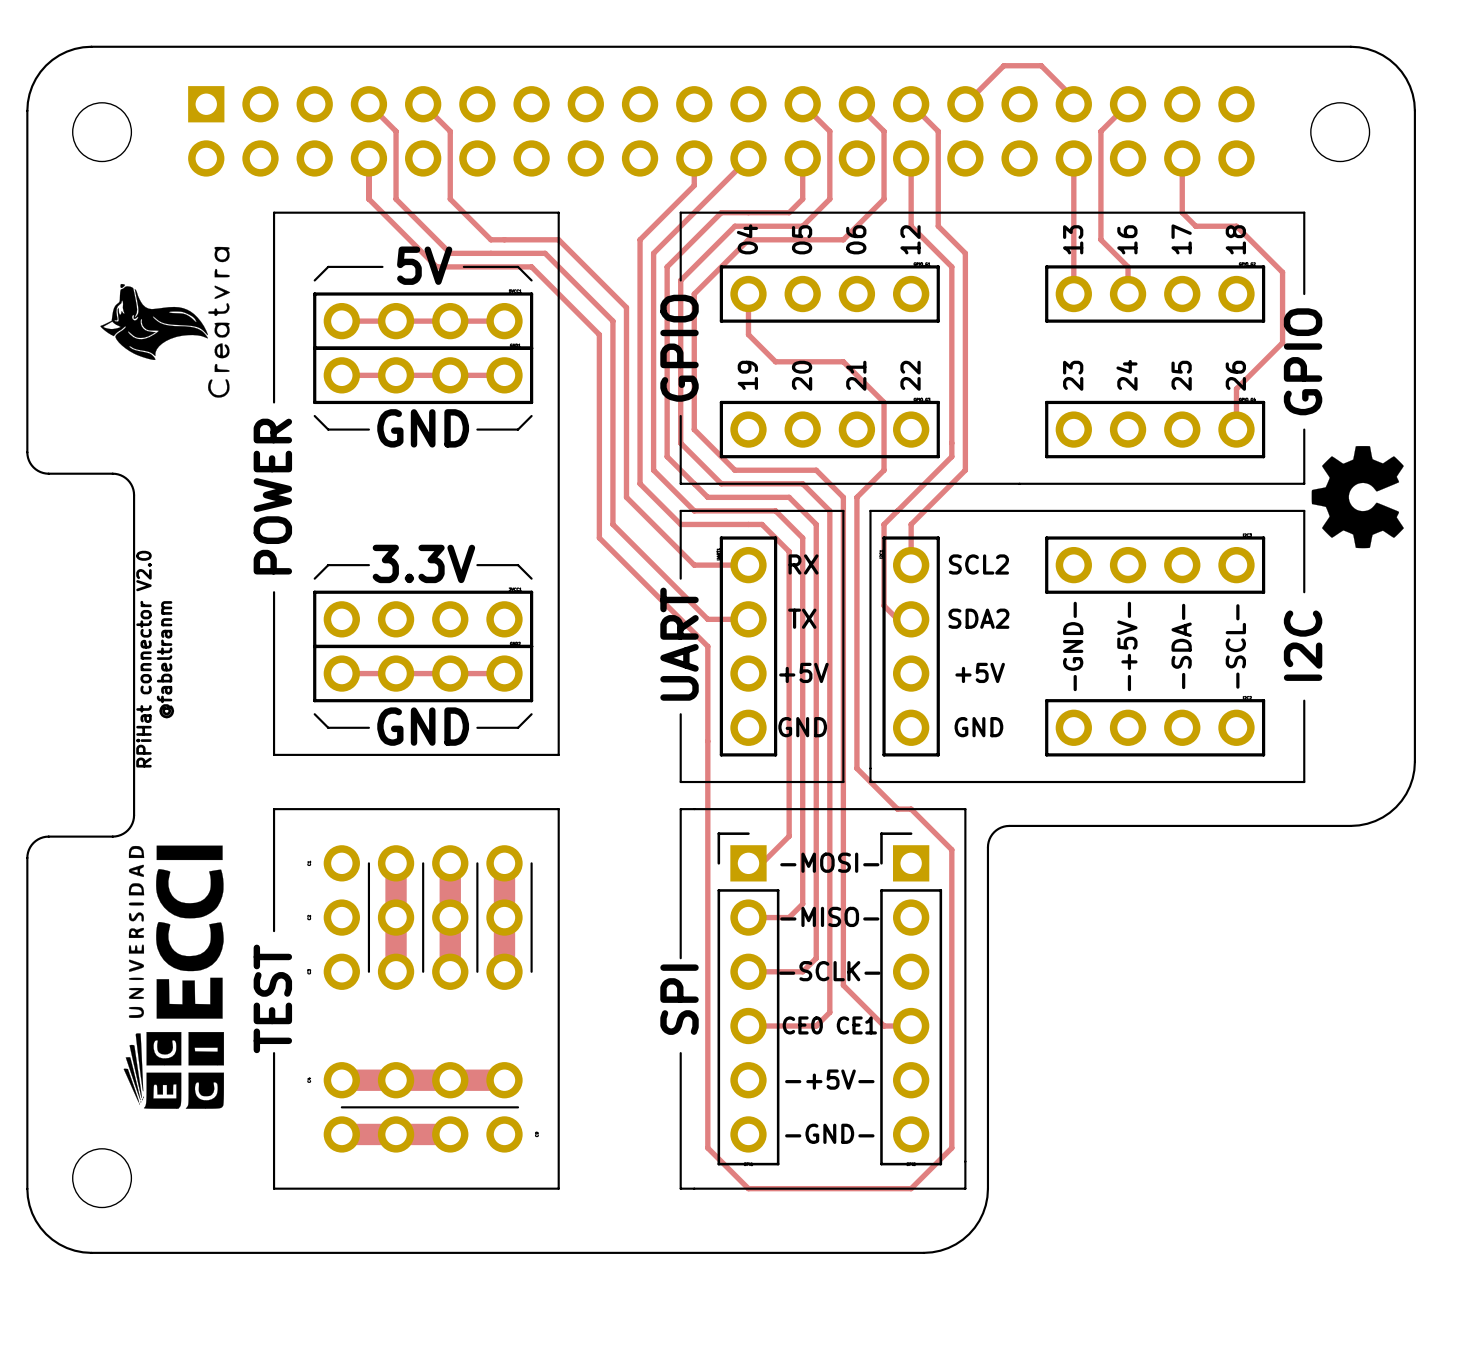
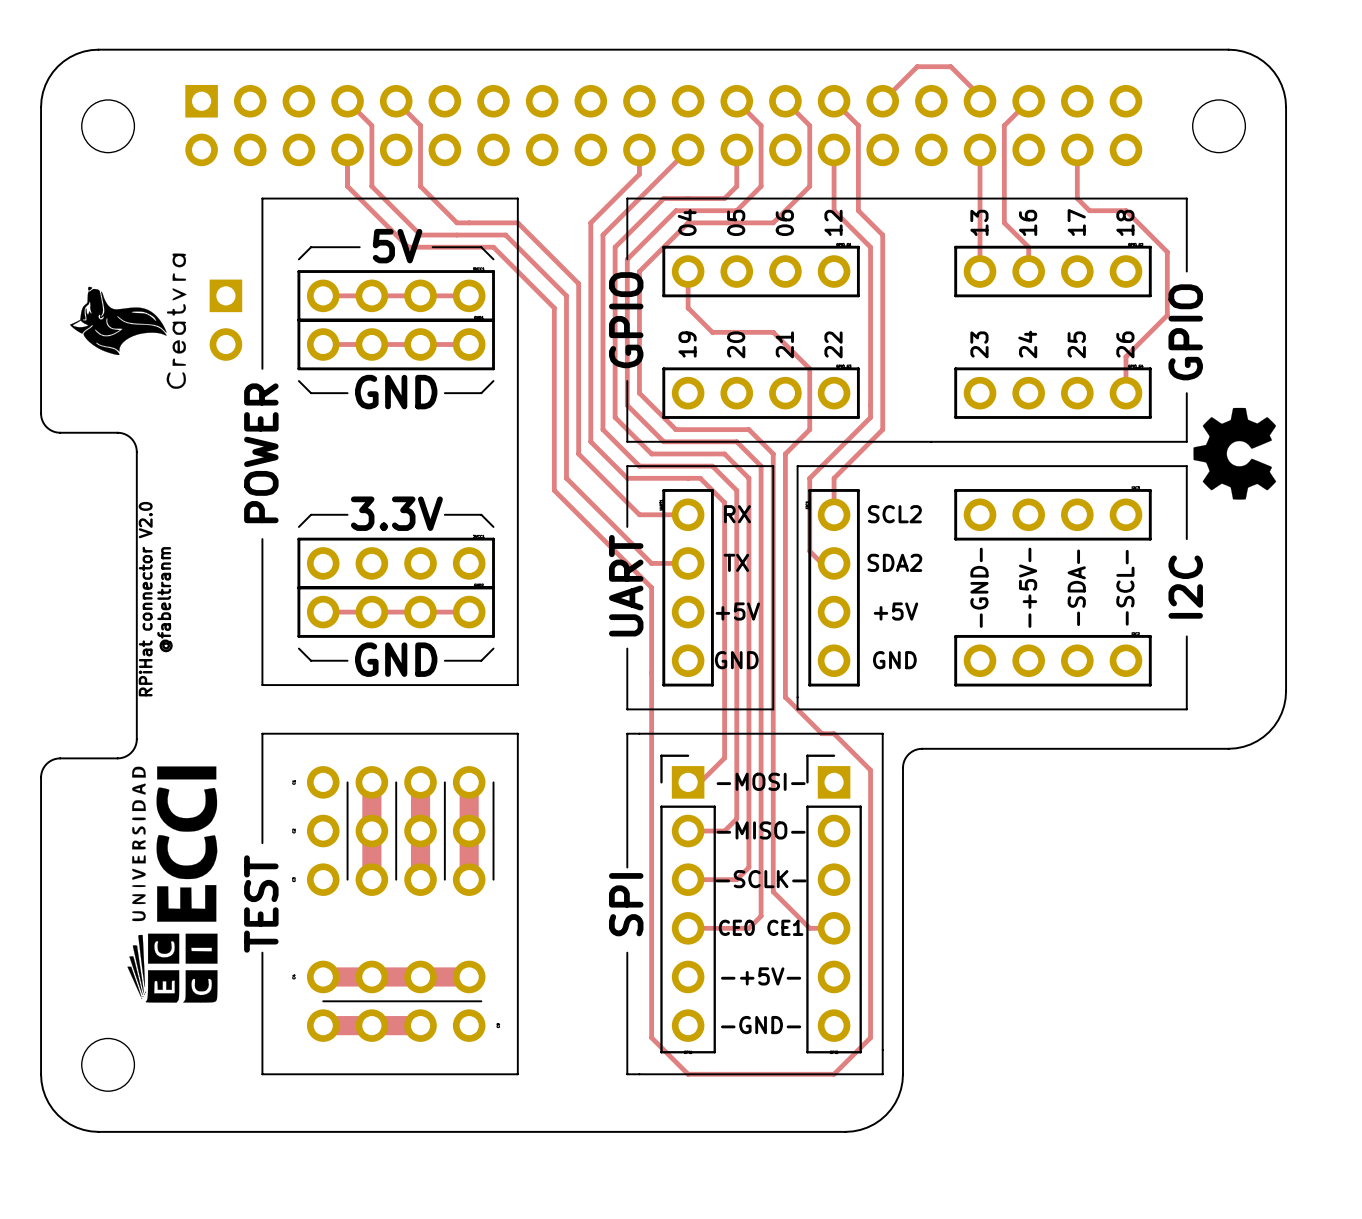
drawing position: (165, 322) -> (128, 321)
part: none -> (225, 320)

